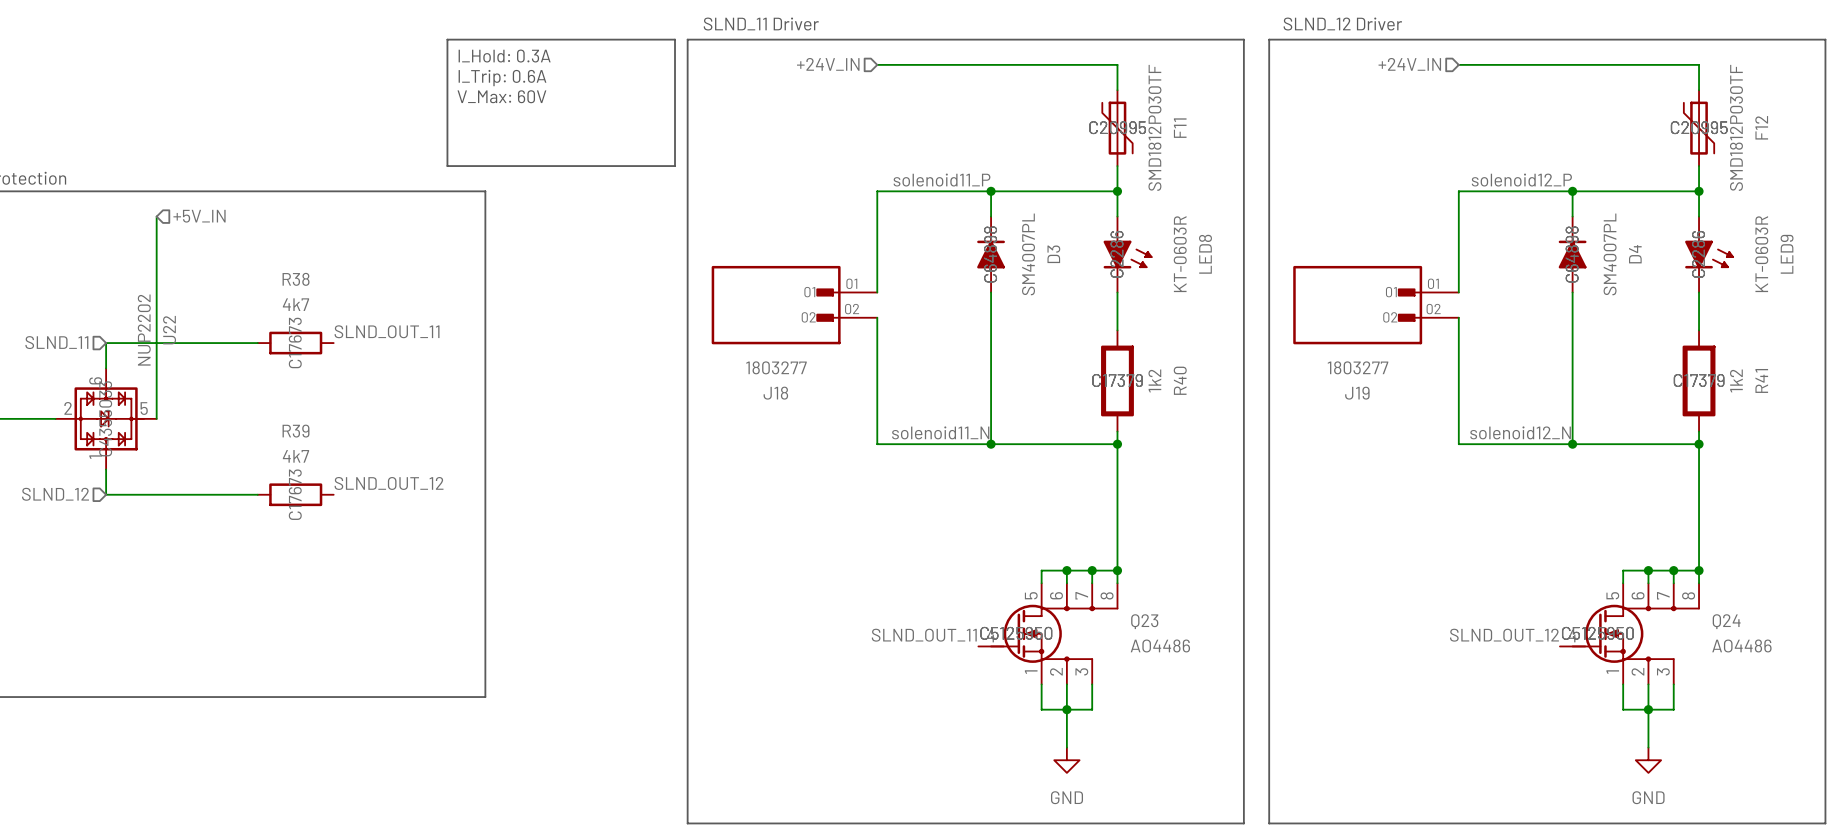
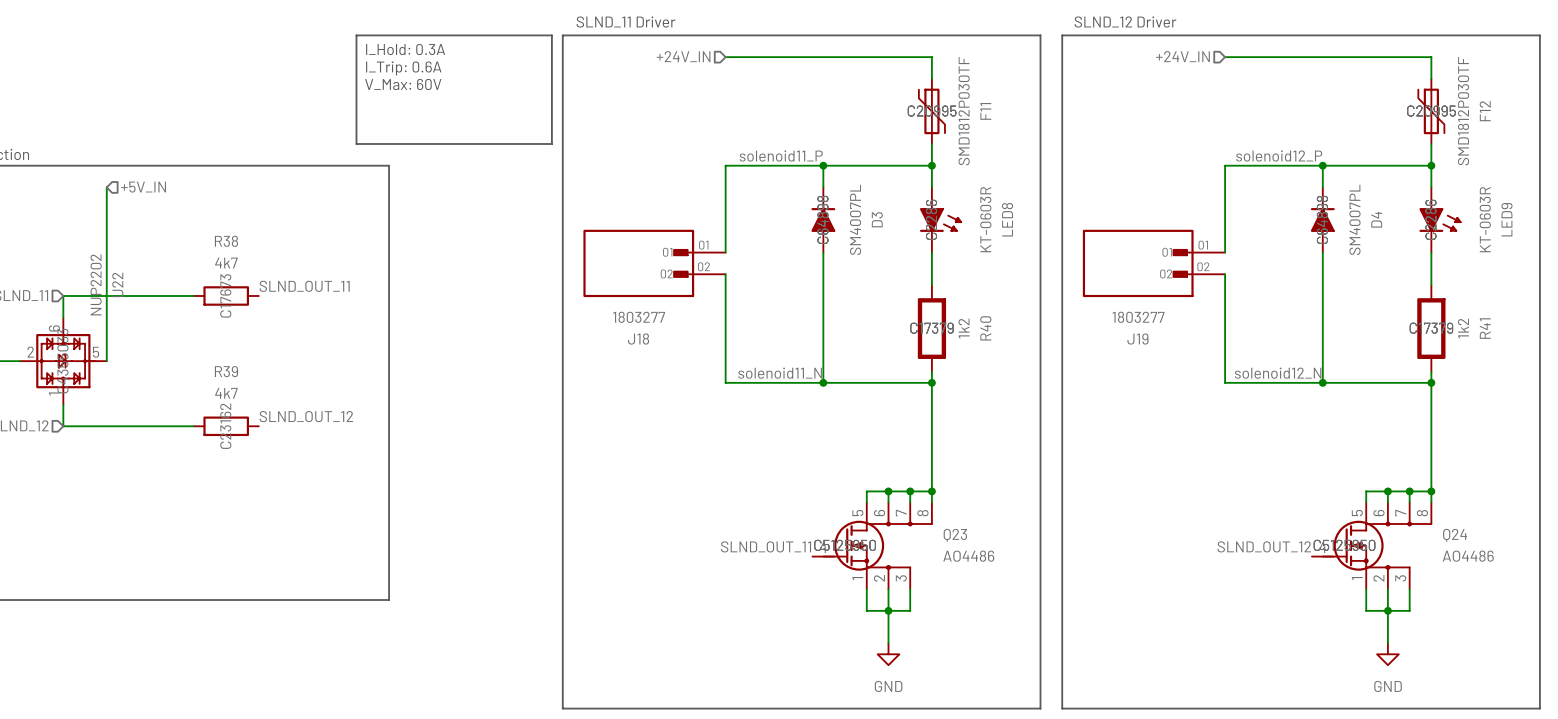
R39 text: C17673 (295, 494) -> C23162 (225, 426)

